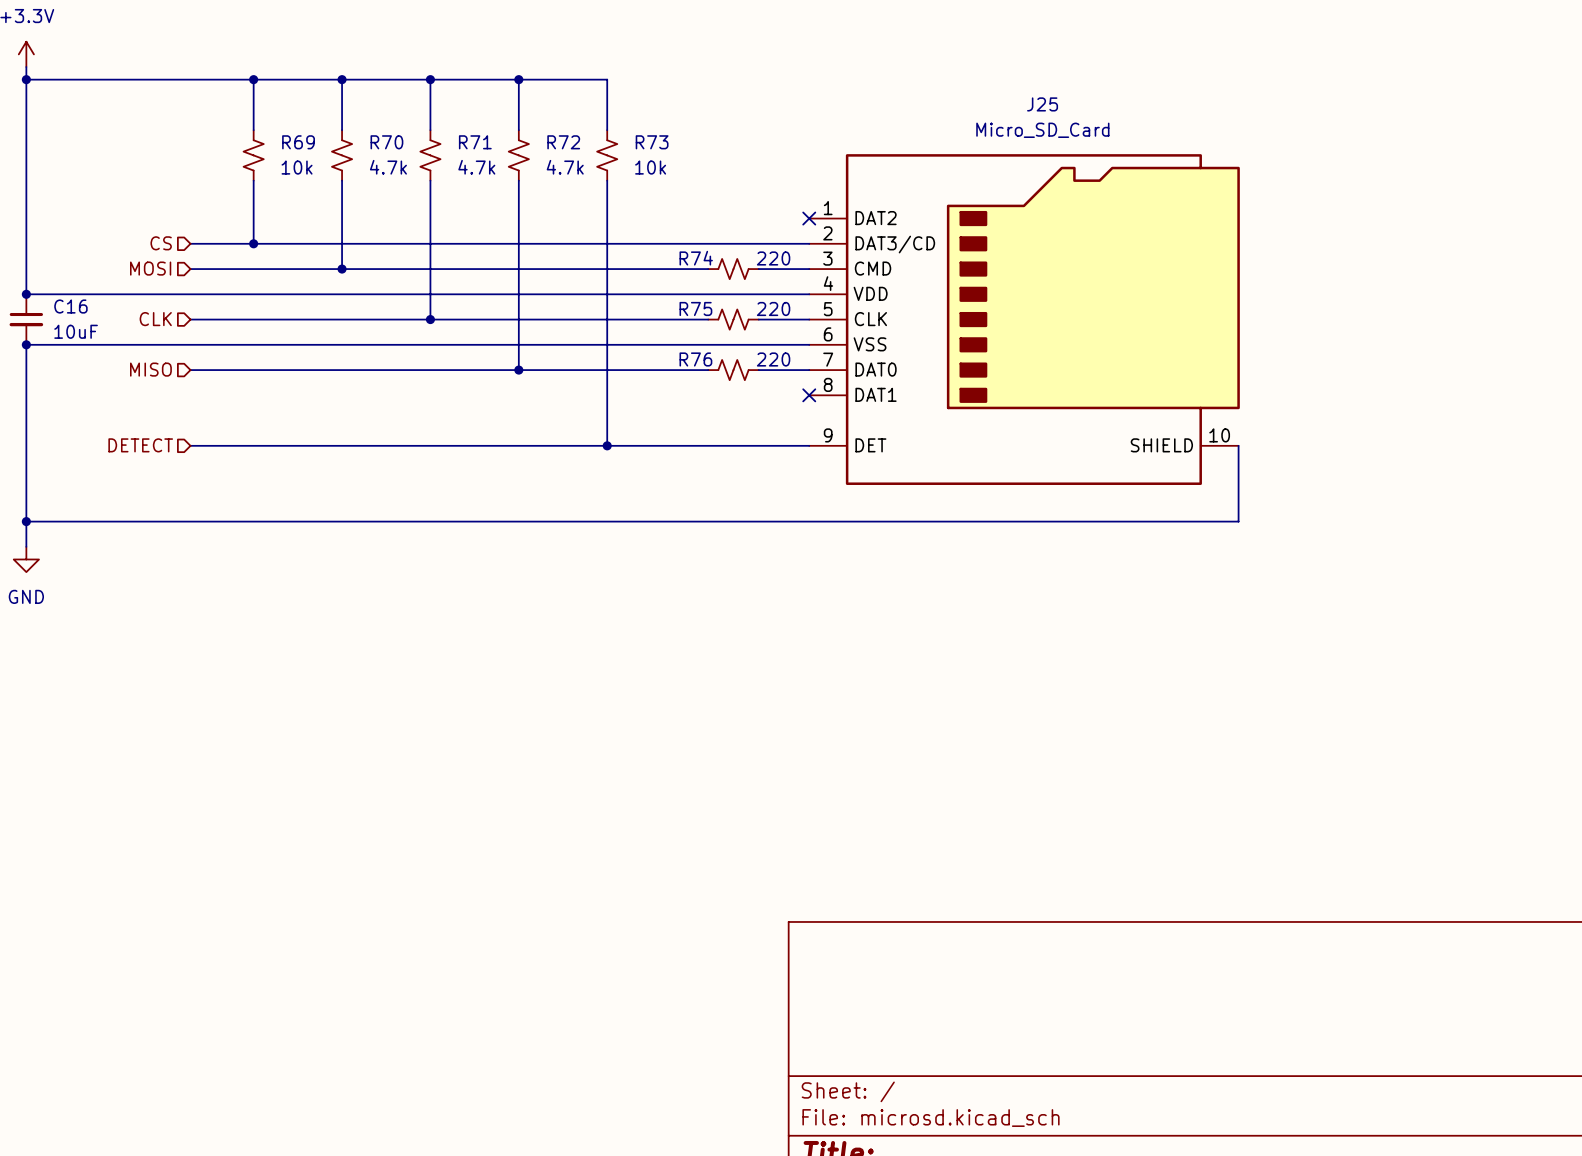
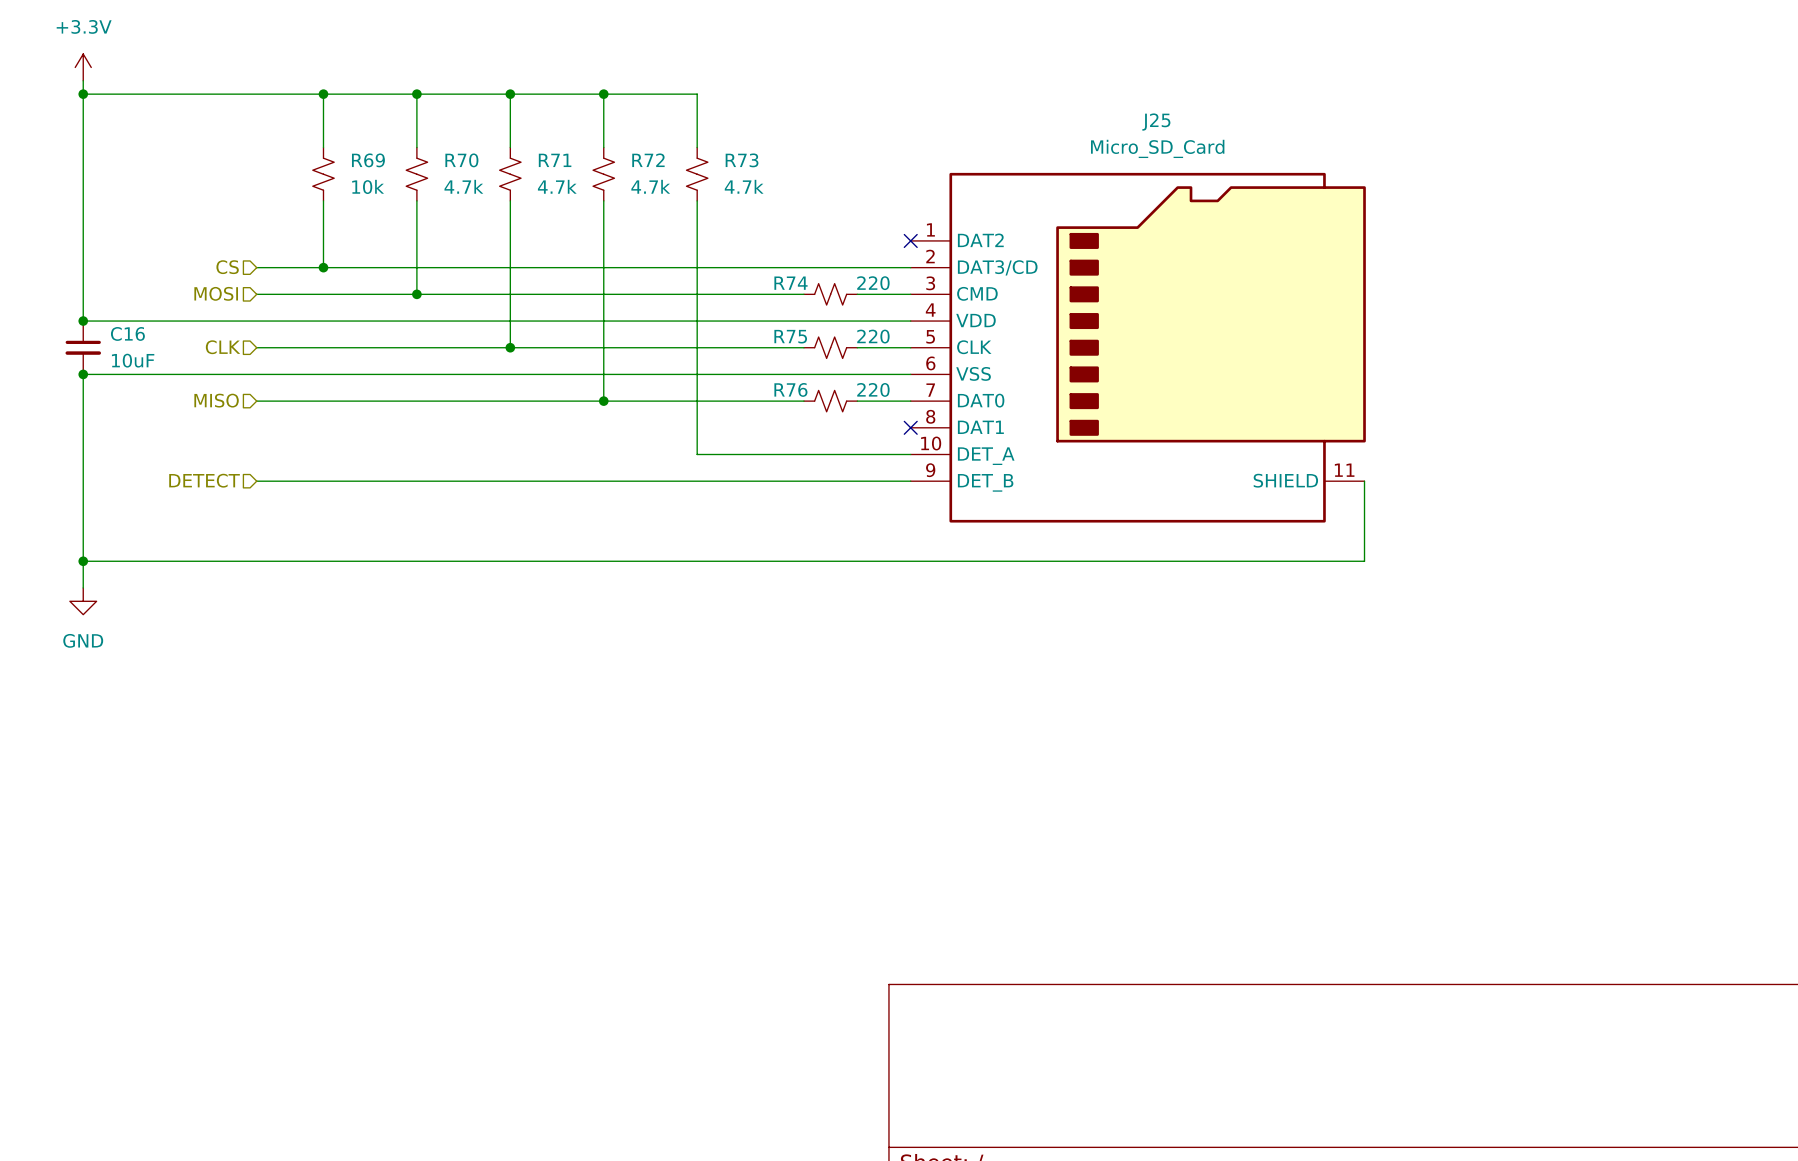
J25 symbol: [809, 154, 1240, 485] -> [910, 172, 1366, 523]
R73 value: 10k (650, 167) -> 4.7k (744, 186)
wire: (607, 420) (607, 445) -> (697, 454) (910, 454)
junction: (607, 445) -> none

